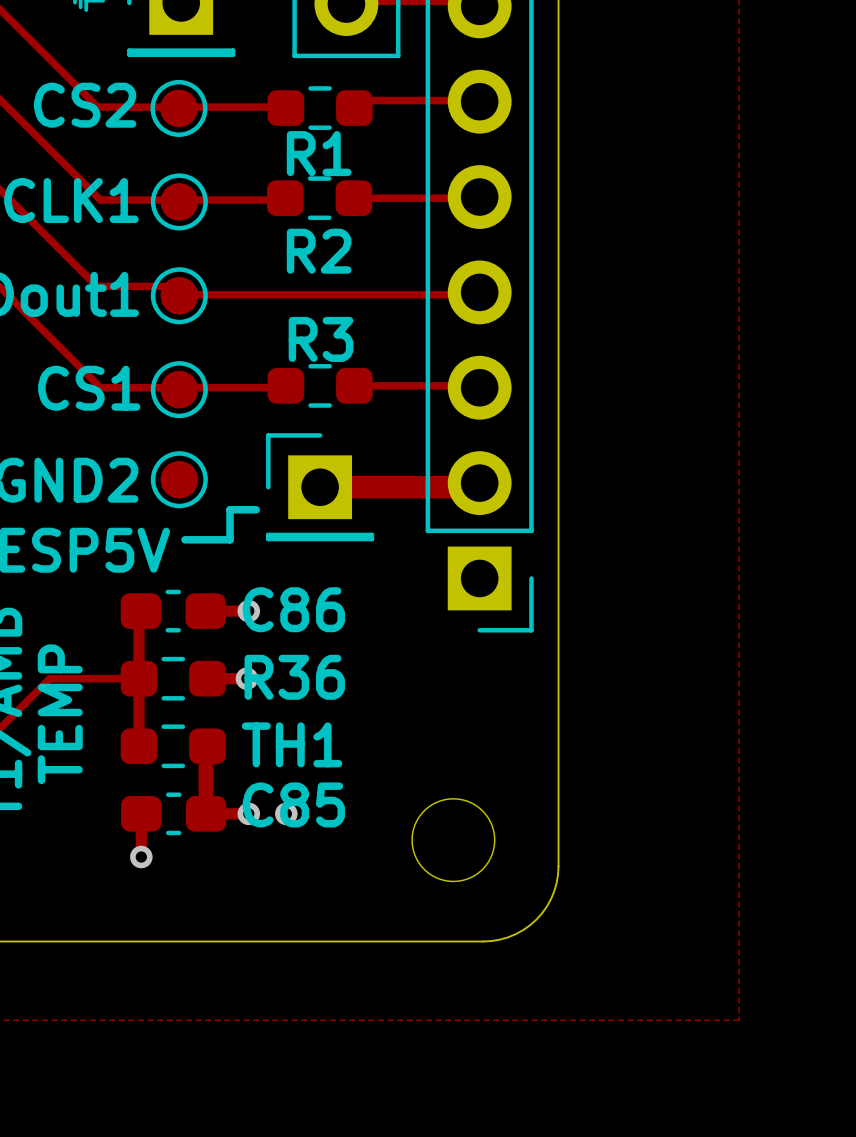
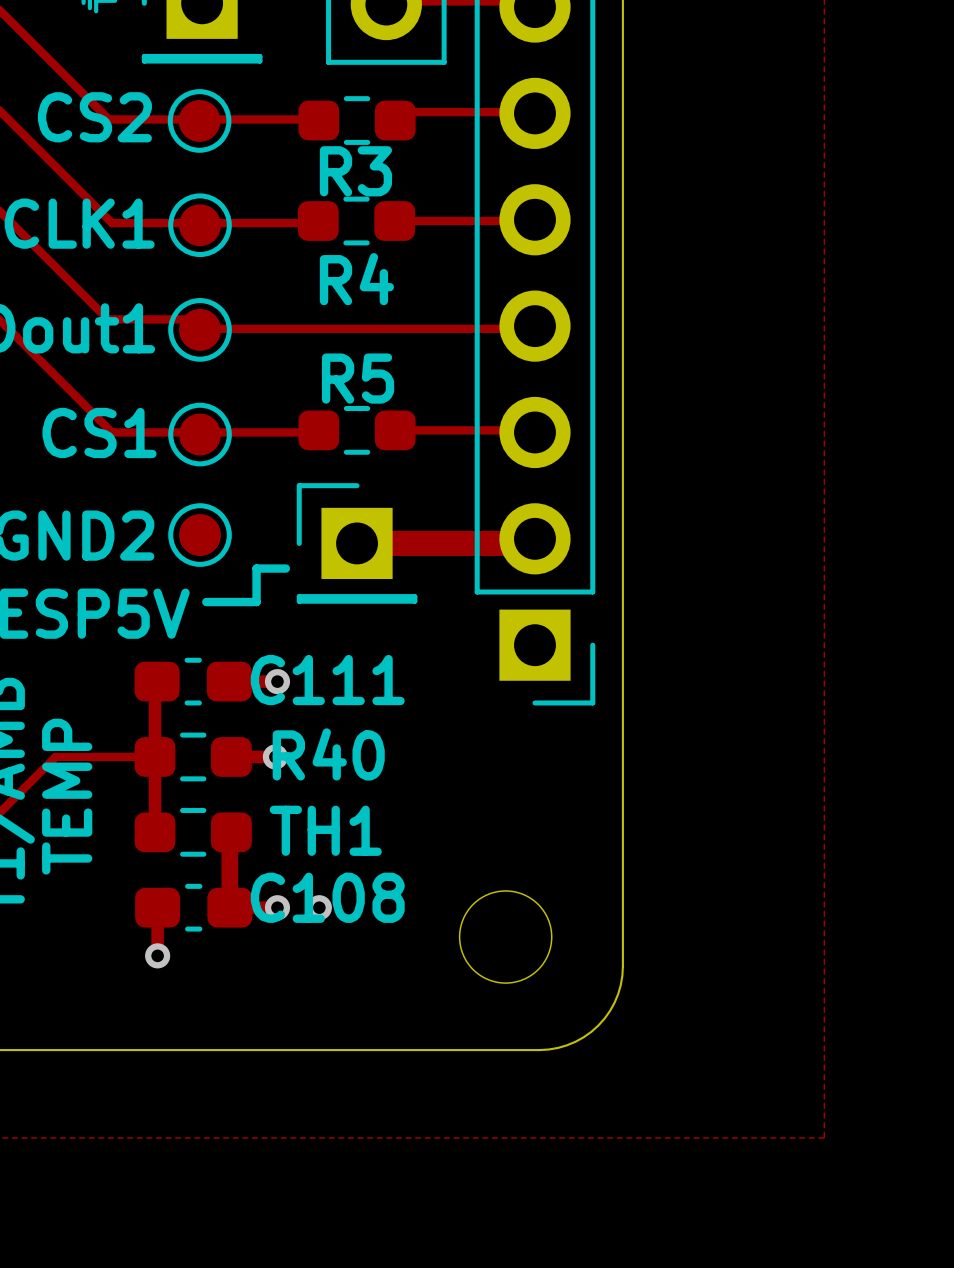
R1 name: R1 (319, 153) -> R3 (355, 171)
R2 name: R2 (319, 251) -> R4 (356, 279)
R3 name: R3 (321, 339) -> R5 (358, 378)
C86 name: C86 (293, 609) -> C111 (327, 680)
R36 name: R36 (294, 677) -> R40 (328, 754)
C85 name: C85 (293, 804) -> C108 (327, 897)

